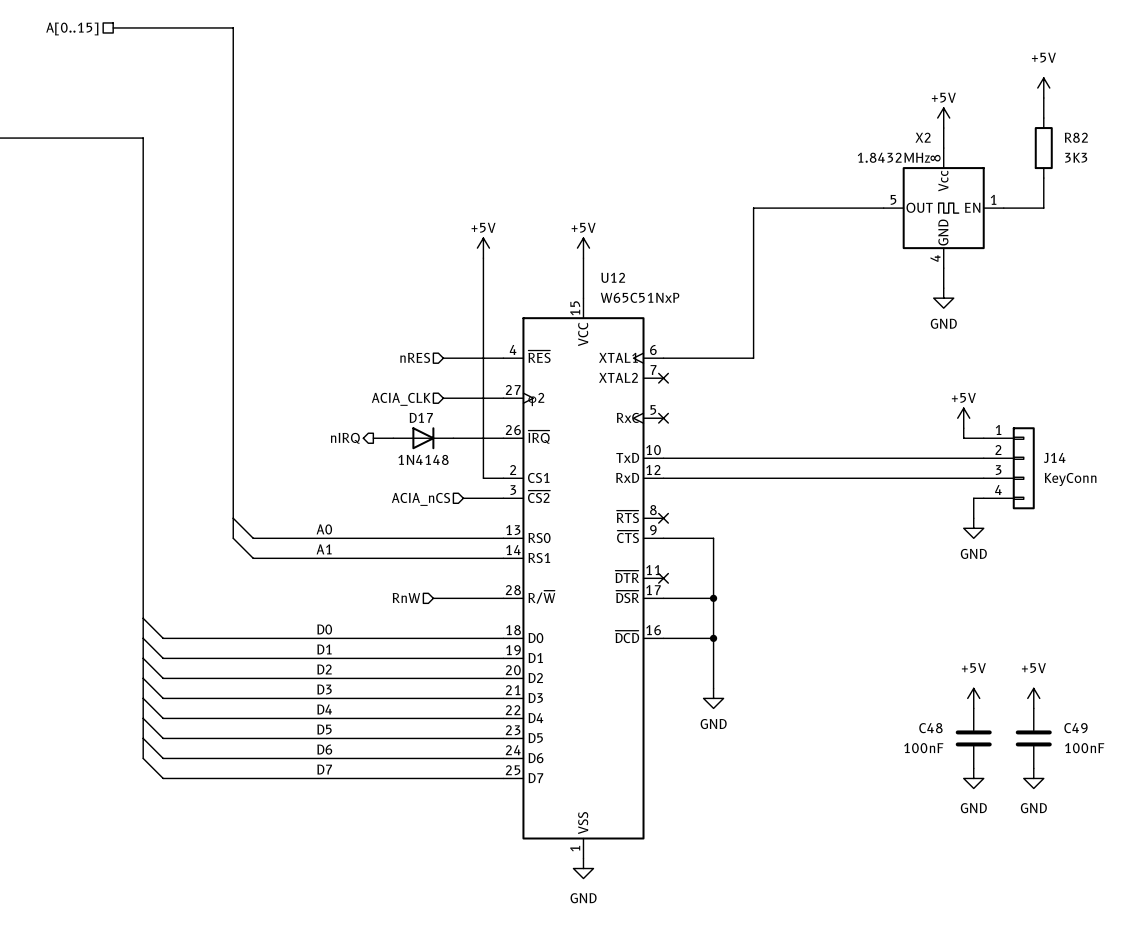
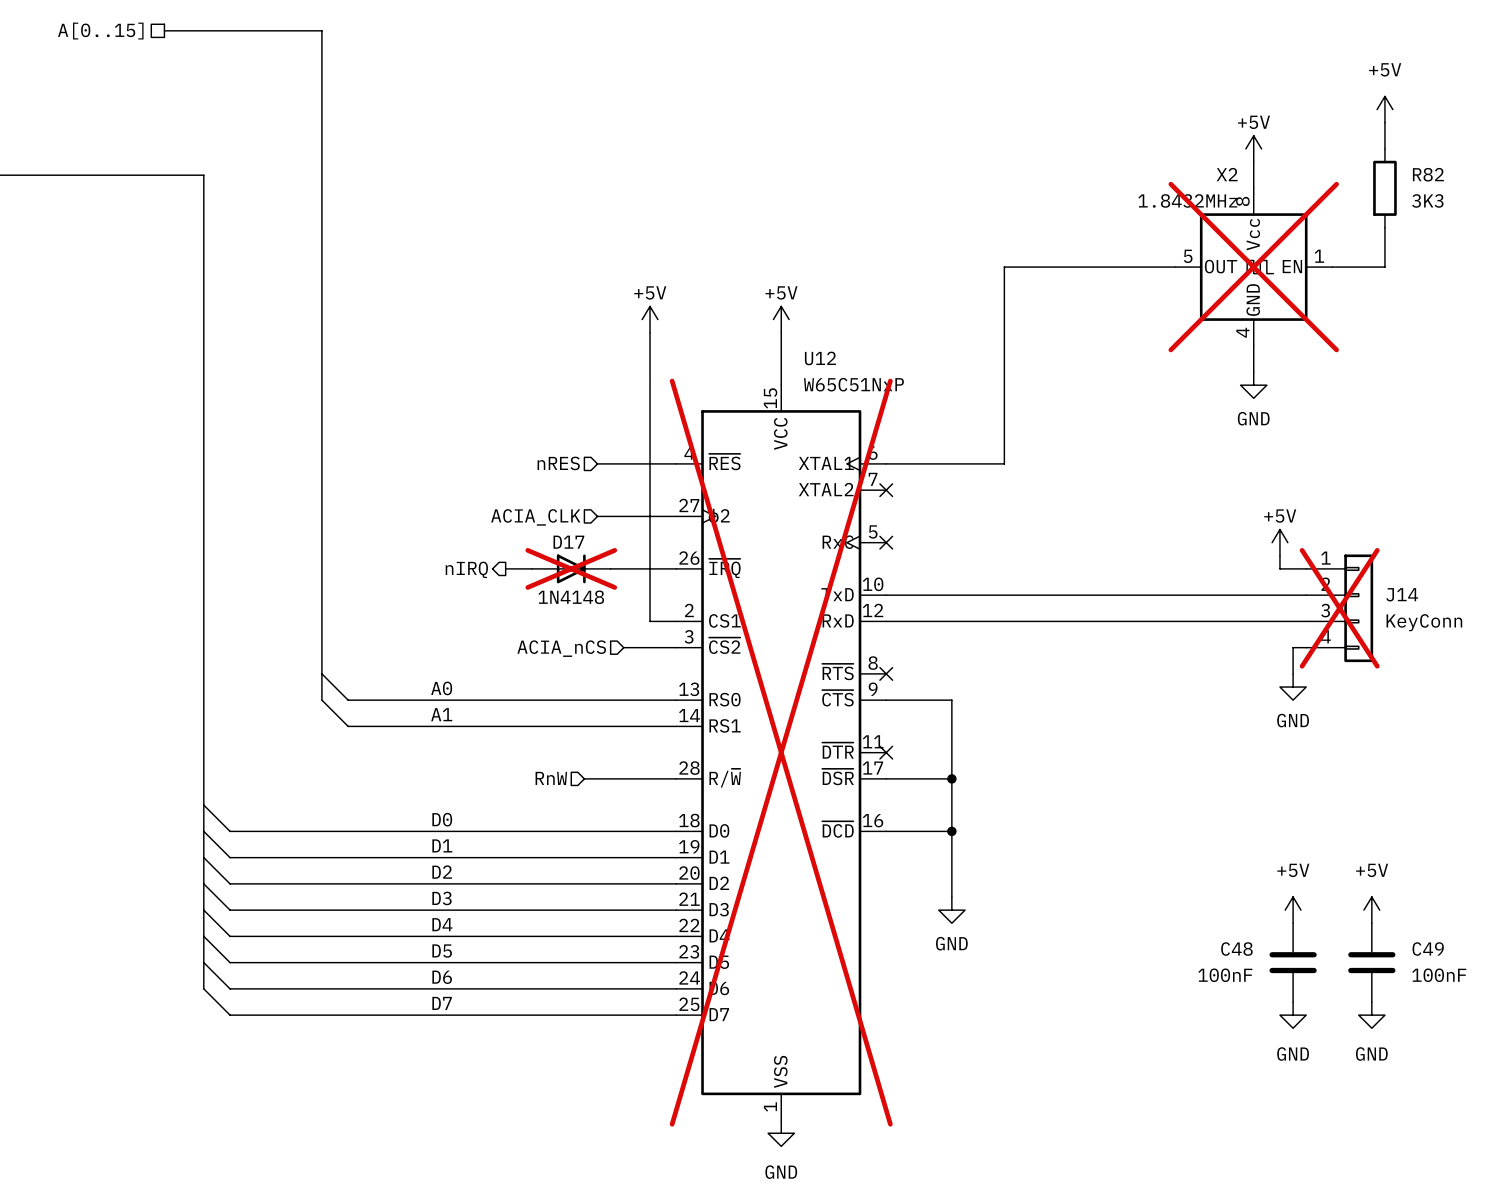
X2 do-not-place cross: none -> (1253, 267)
D17 do-not-place cross: none -> (571, 568)
J14 do-not-place cross: none -> (1339, 608)
U12 do-not-place cross: none -> (781, 752)

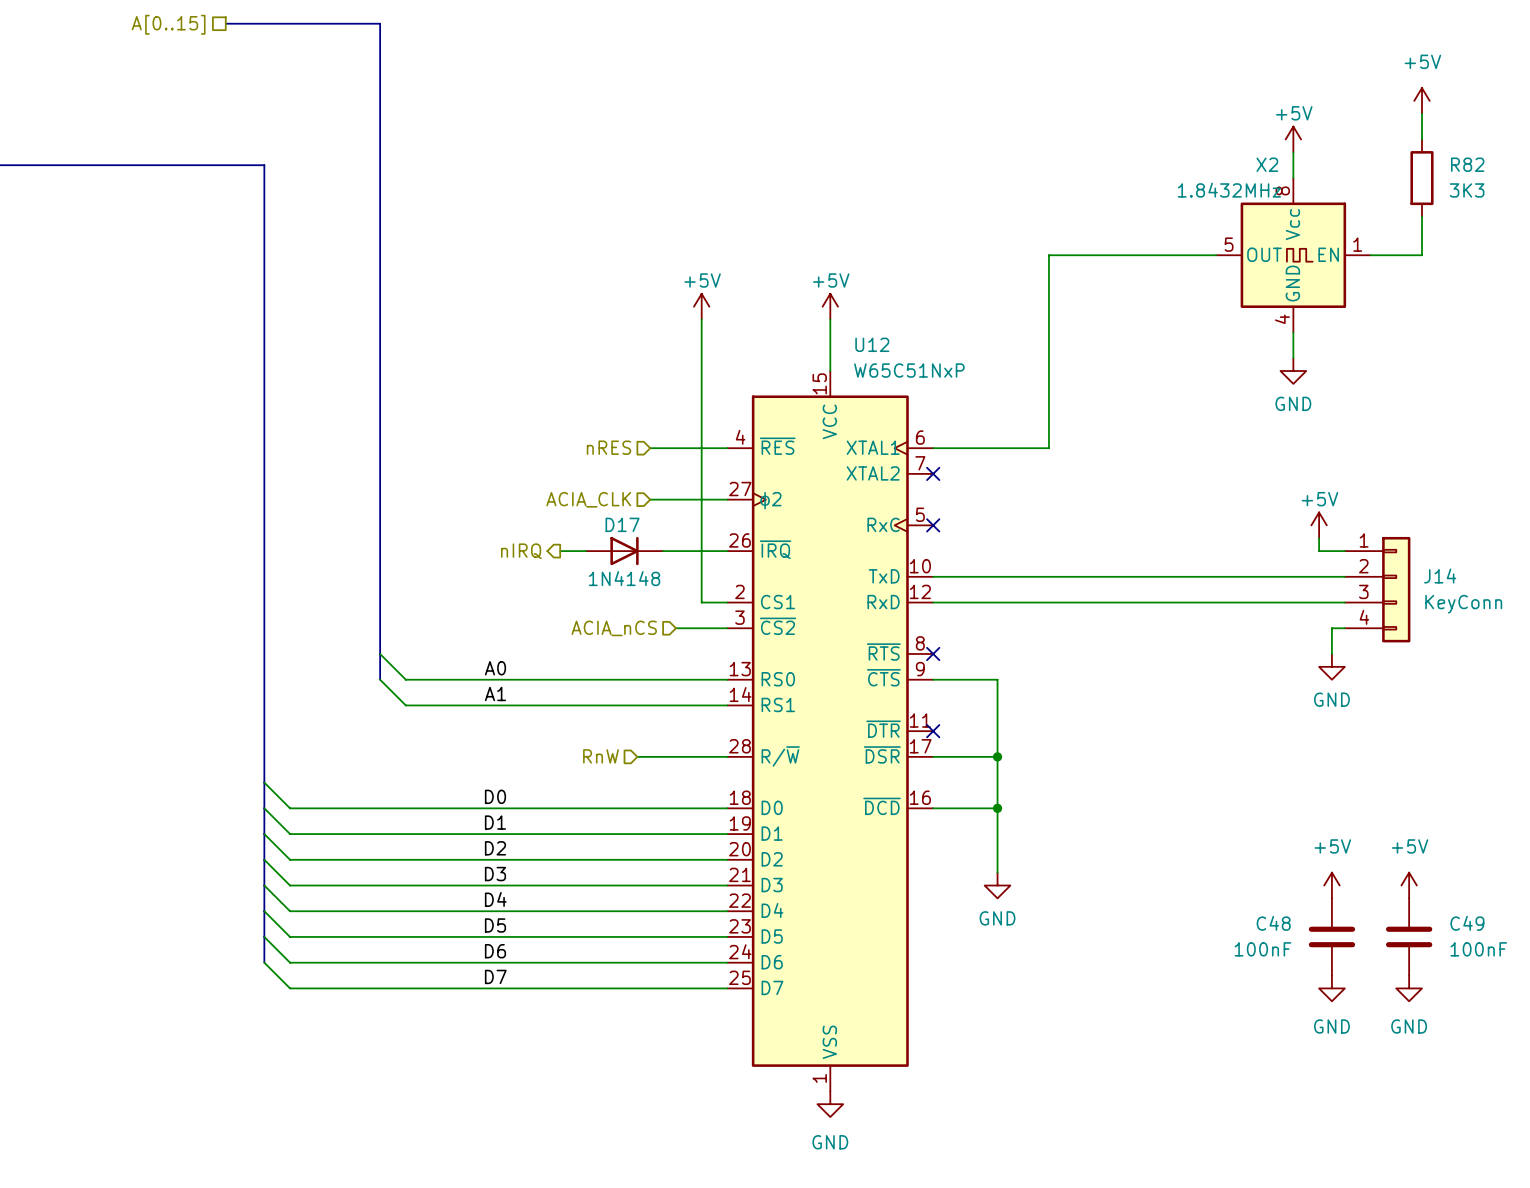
X2 do-not-place cross: (1253, 267) -> none
D17 do-not-place cross: (571, 568) -> none
J14 do-not-place cross: (1339, 608) -> none
U12 do-not-place cross: (781, 752) -> none

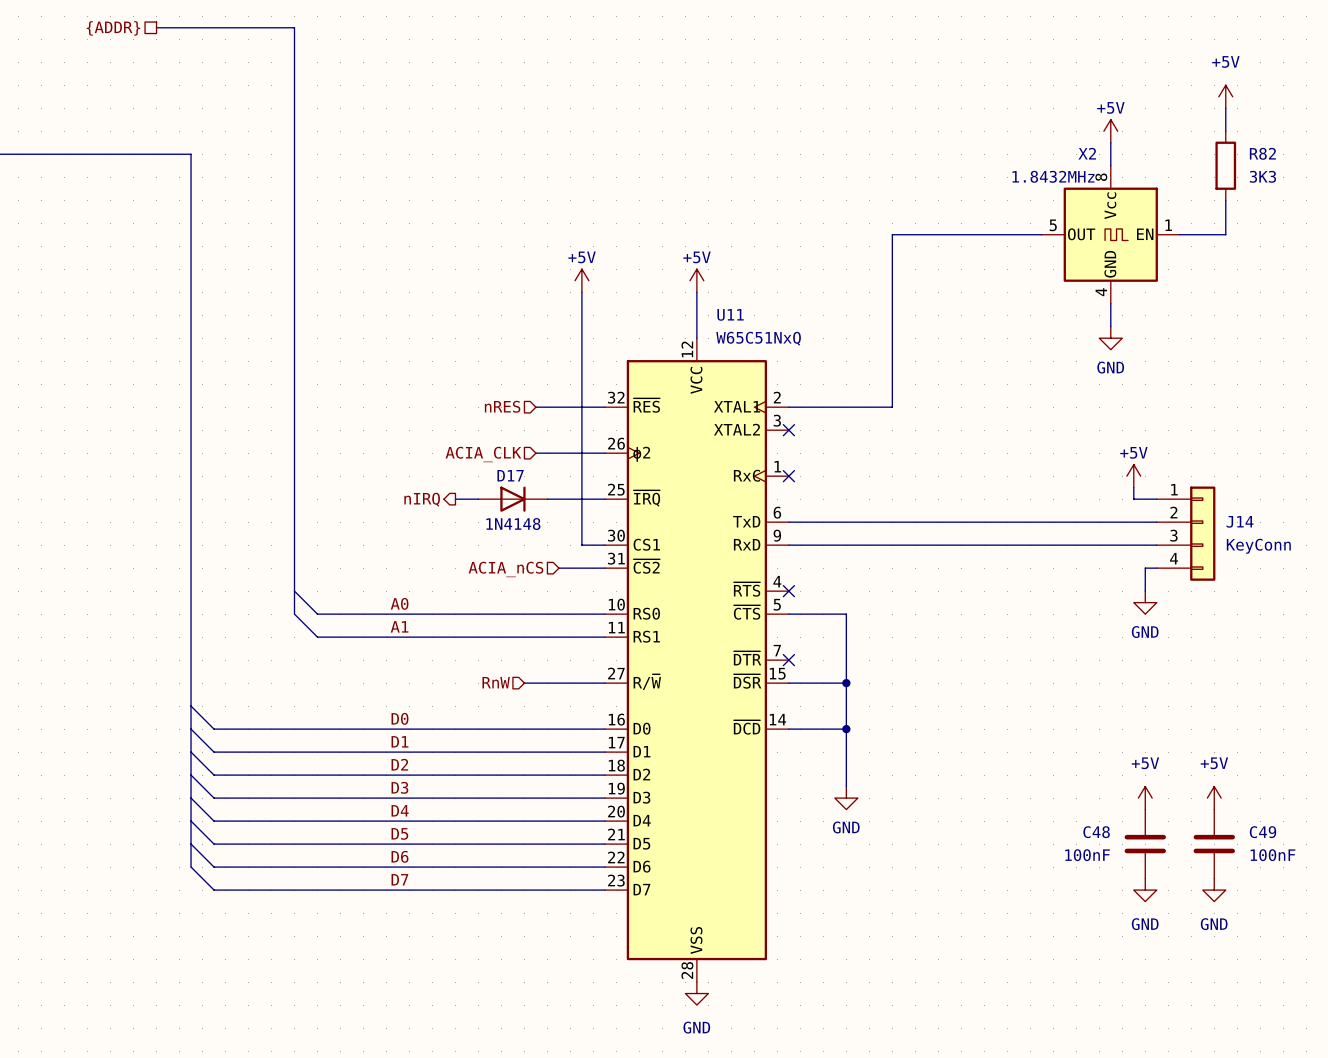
hierarchical label: A[0..15] (168, 24) -> {ADDR} (113, 28)
U12 name: U12 (872, 344) -> U11 (730, 314)
U12 value: W65C51NxP (909, 370) -> W65C51NxQ (758, 338)
U12 symbol: [727, 371, 934, 1092] -> [604, 338, 789, 983]

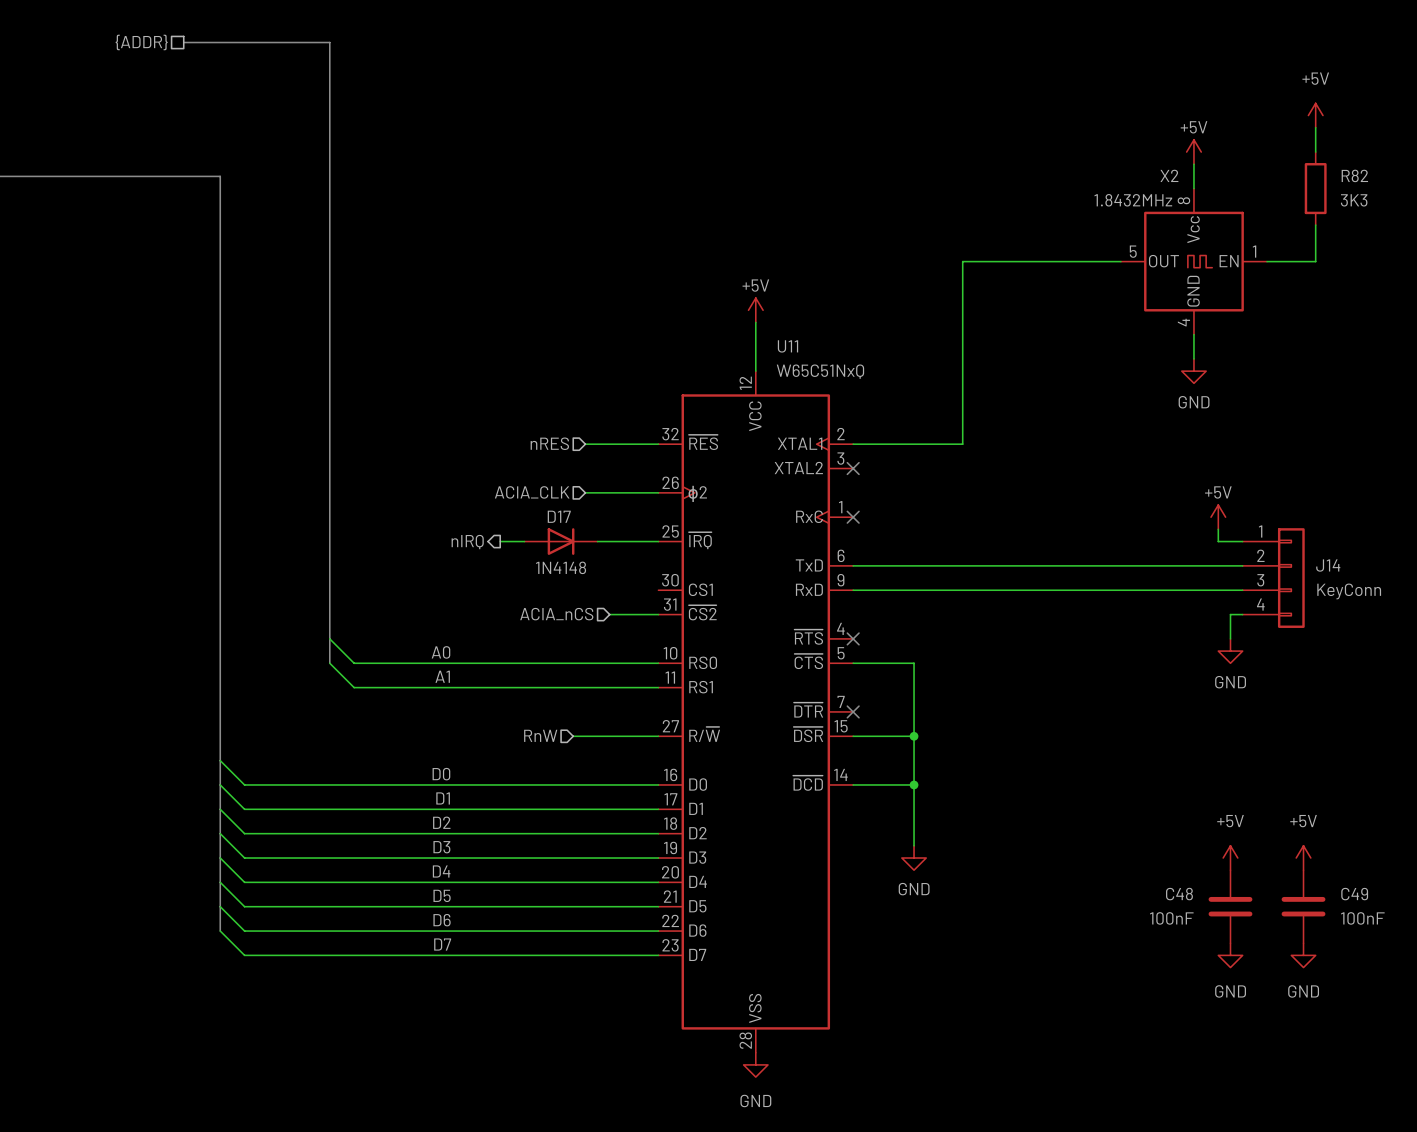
power symbol: +5V (581, 280) -> none
wire: (581, 292) (581, 545) (604, 545) -> none

